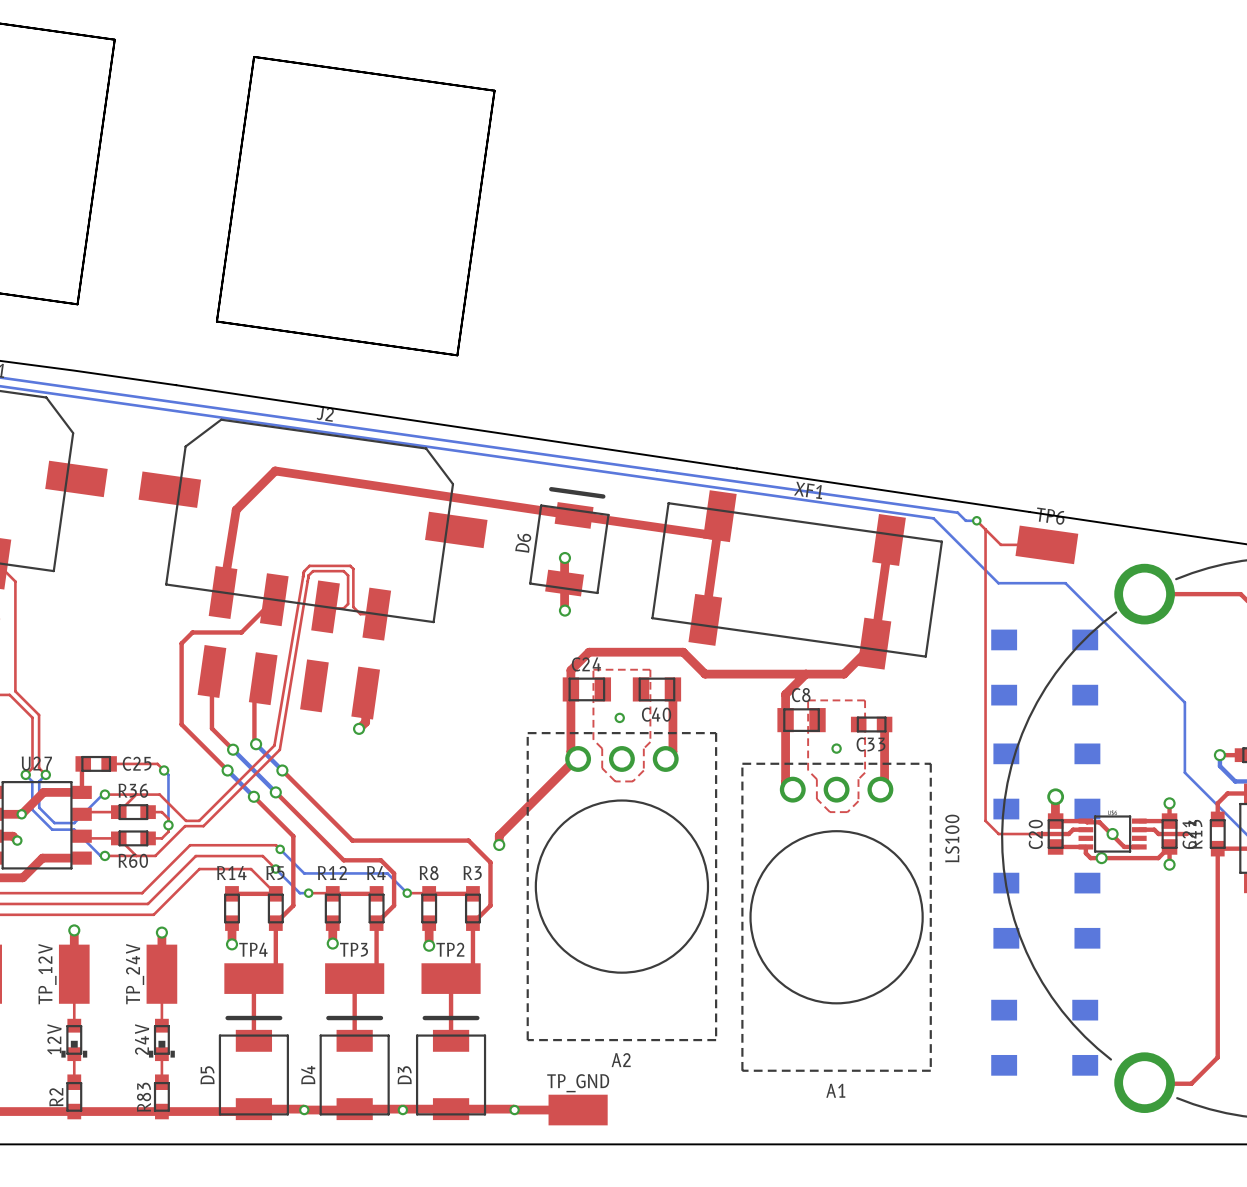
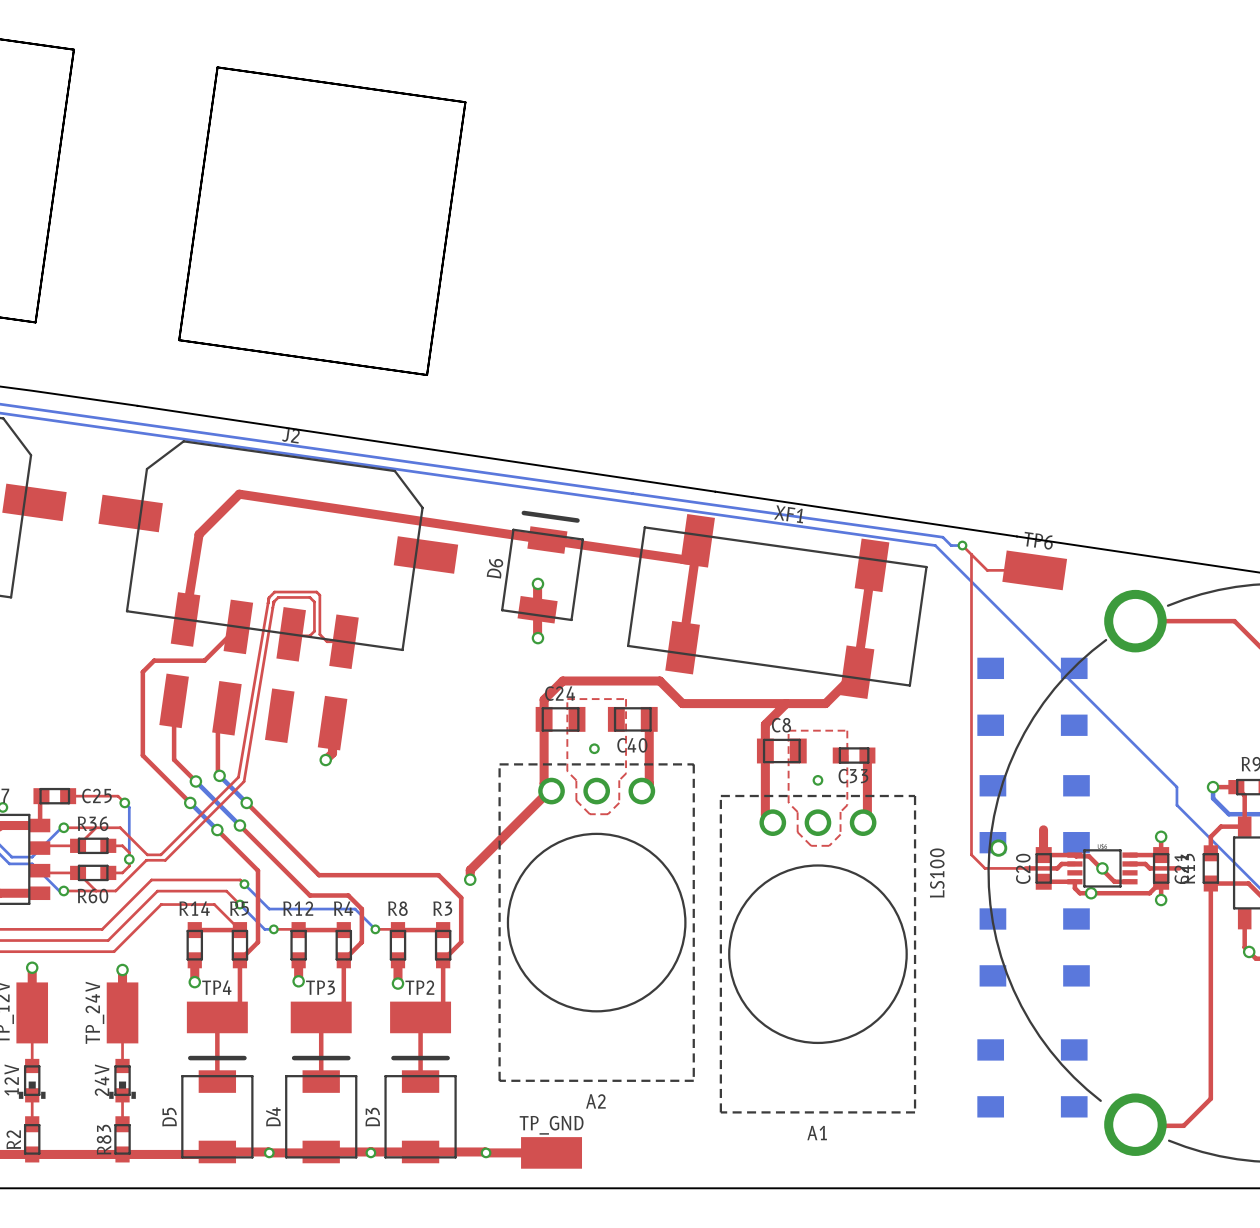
bottom track: (933, 518) (998, 583) (1065, 583) (1184, 702) (1184, 755) -> (917, 543) (935, 545) (1176, 787)
via position: (1055, 796) -> (998, 848)

